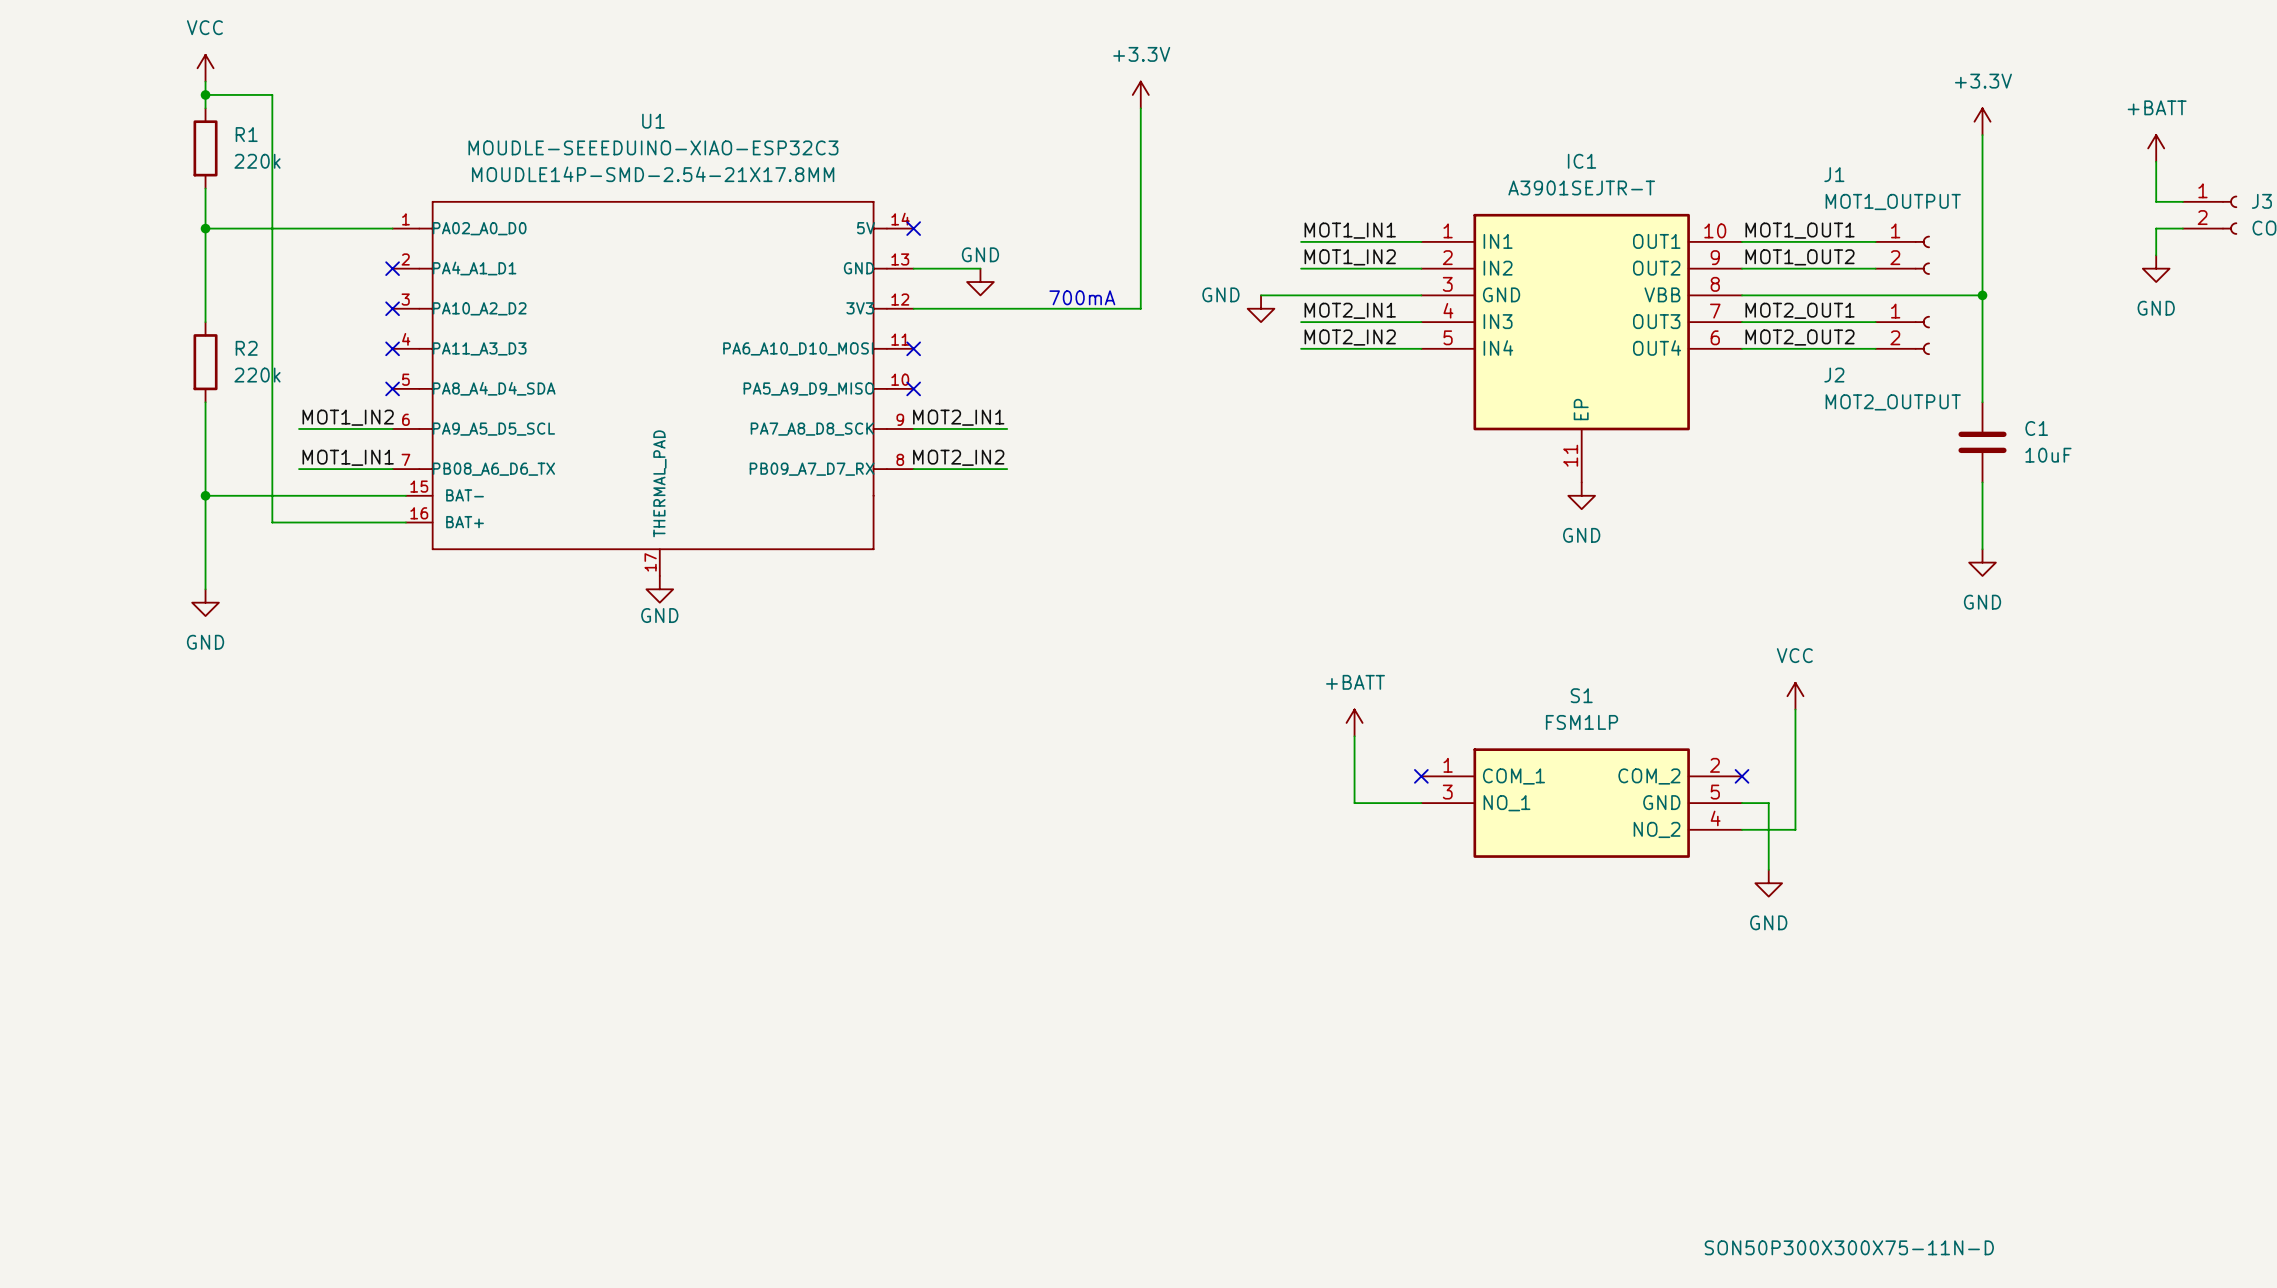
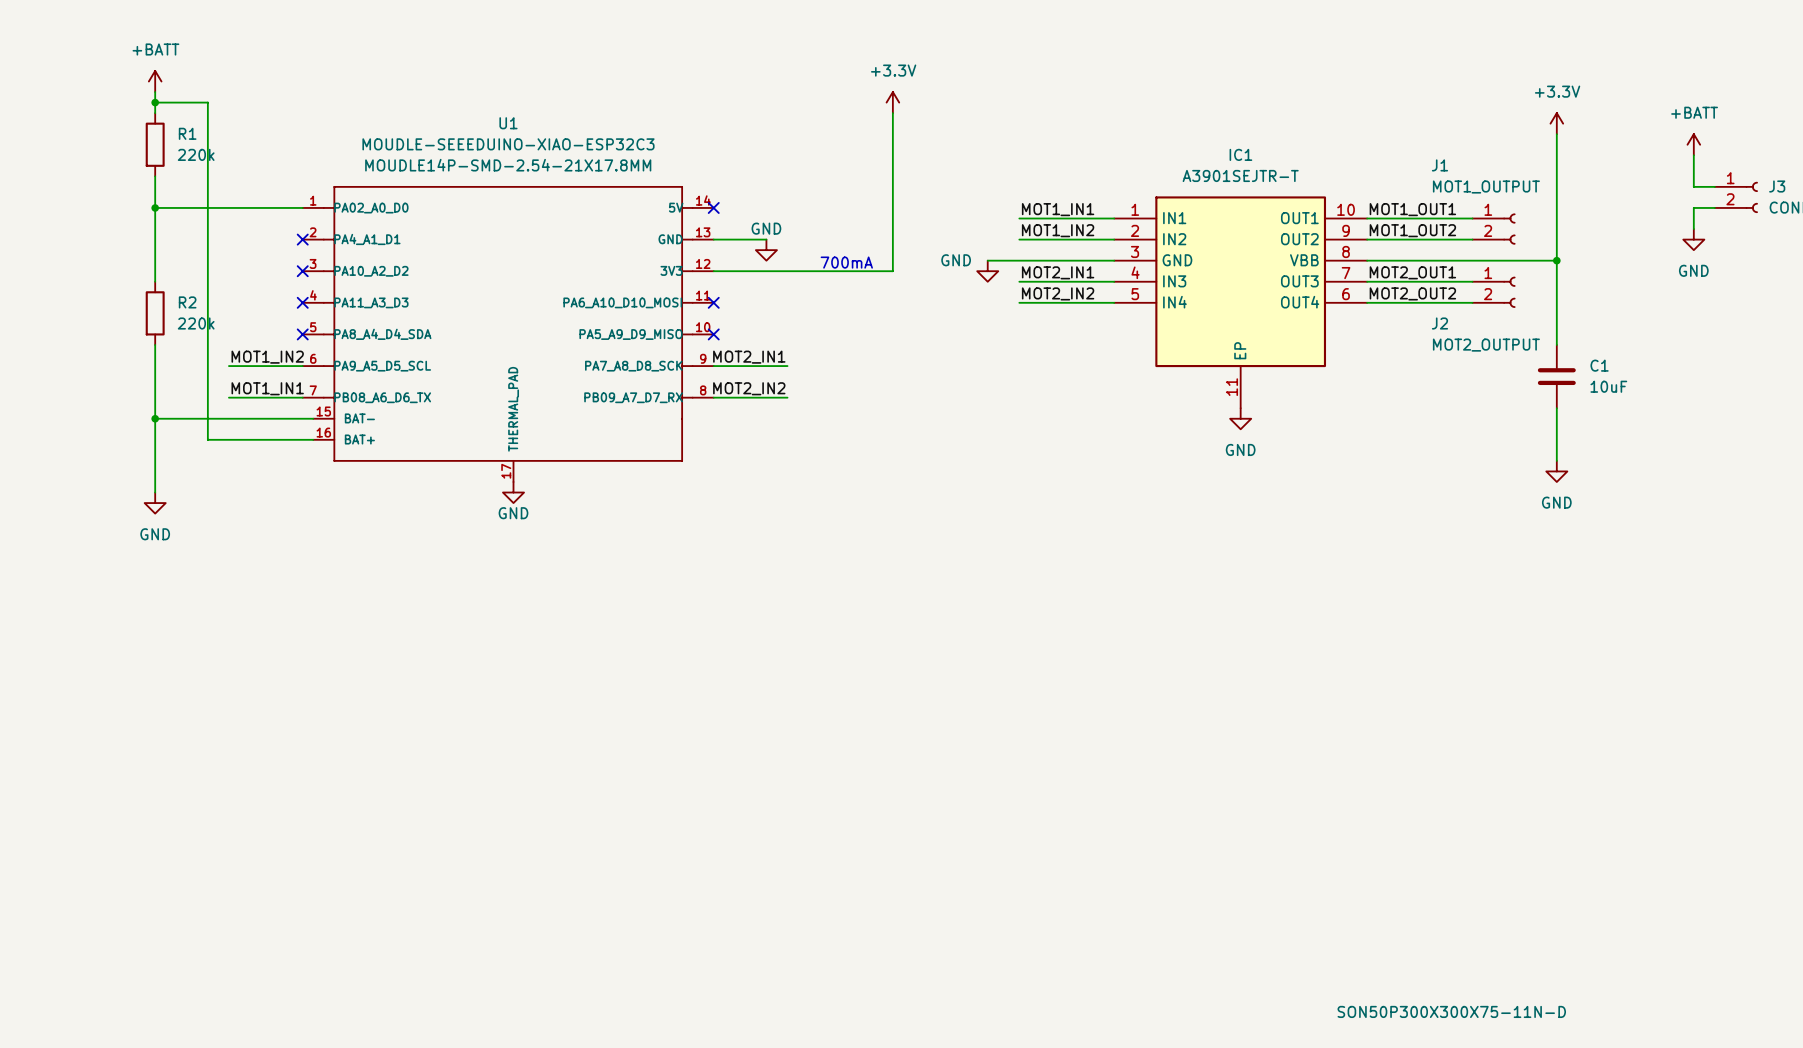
power symbol: VCC (205, 68) -> +BATT (155, 81)
power symbol: VCC (1795, 696) -> none
wire: (1795, 709) (1795, 829) (1742, 829) -> none
power symbol: +BATT (1354, 722) -> none
wire: (1354, 736) (1354, 803) (1421, 803) -> none
no-connect mark: (1421, 776) -> none
no-connect mark: (1742, 776) -> none
S1: FSM1LP (1581, 803) -> none
wire: (1742, 803) (1768, 803) (1768, 869) -> none
power symbol: GND (1768, 883) -> none

